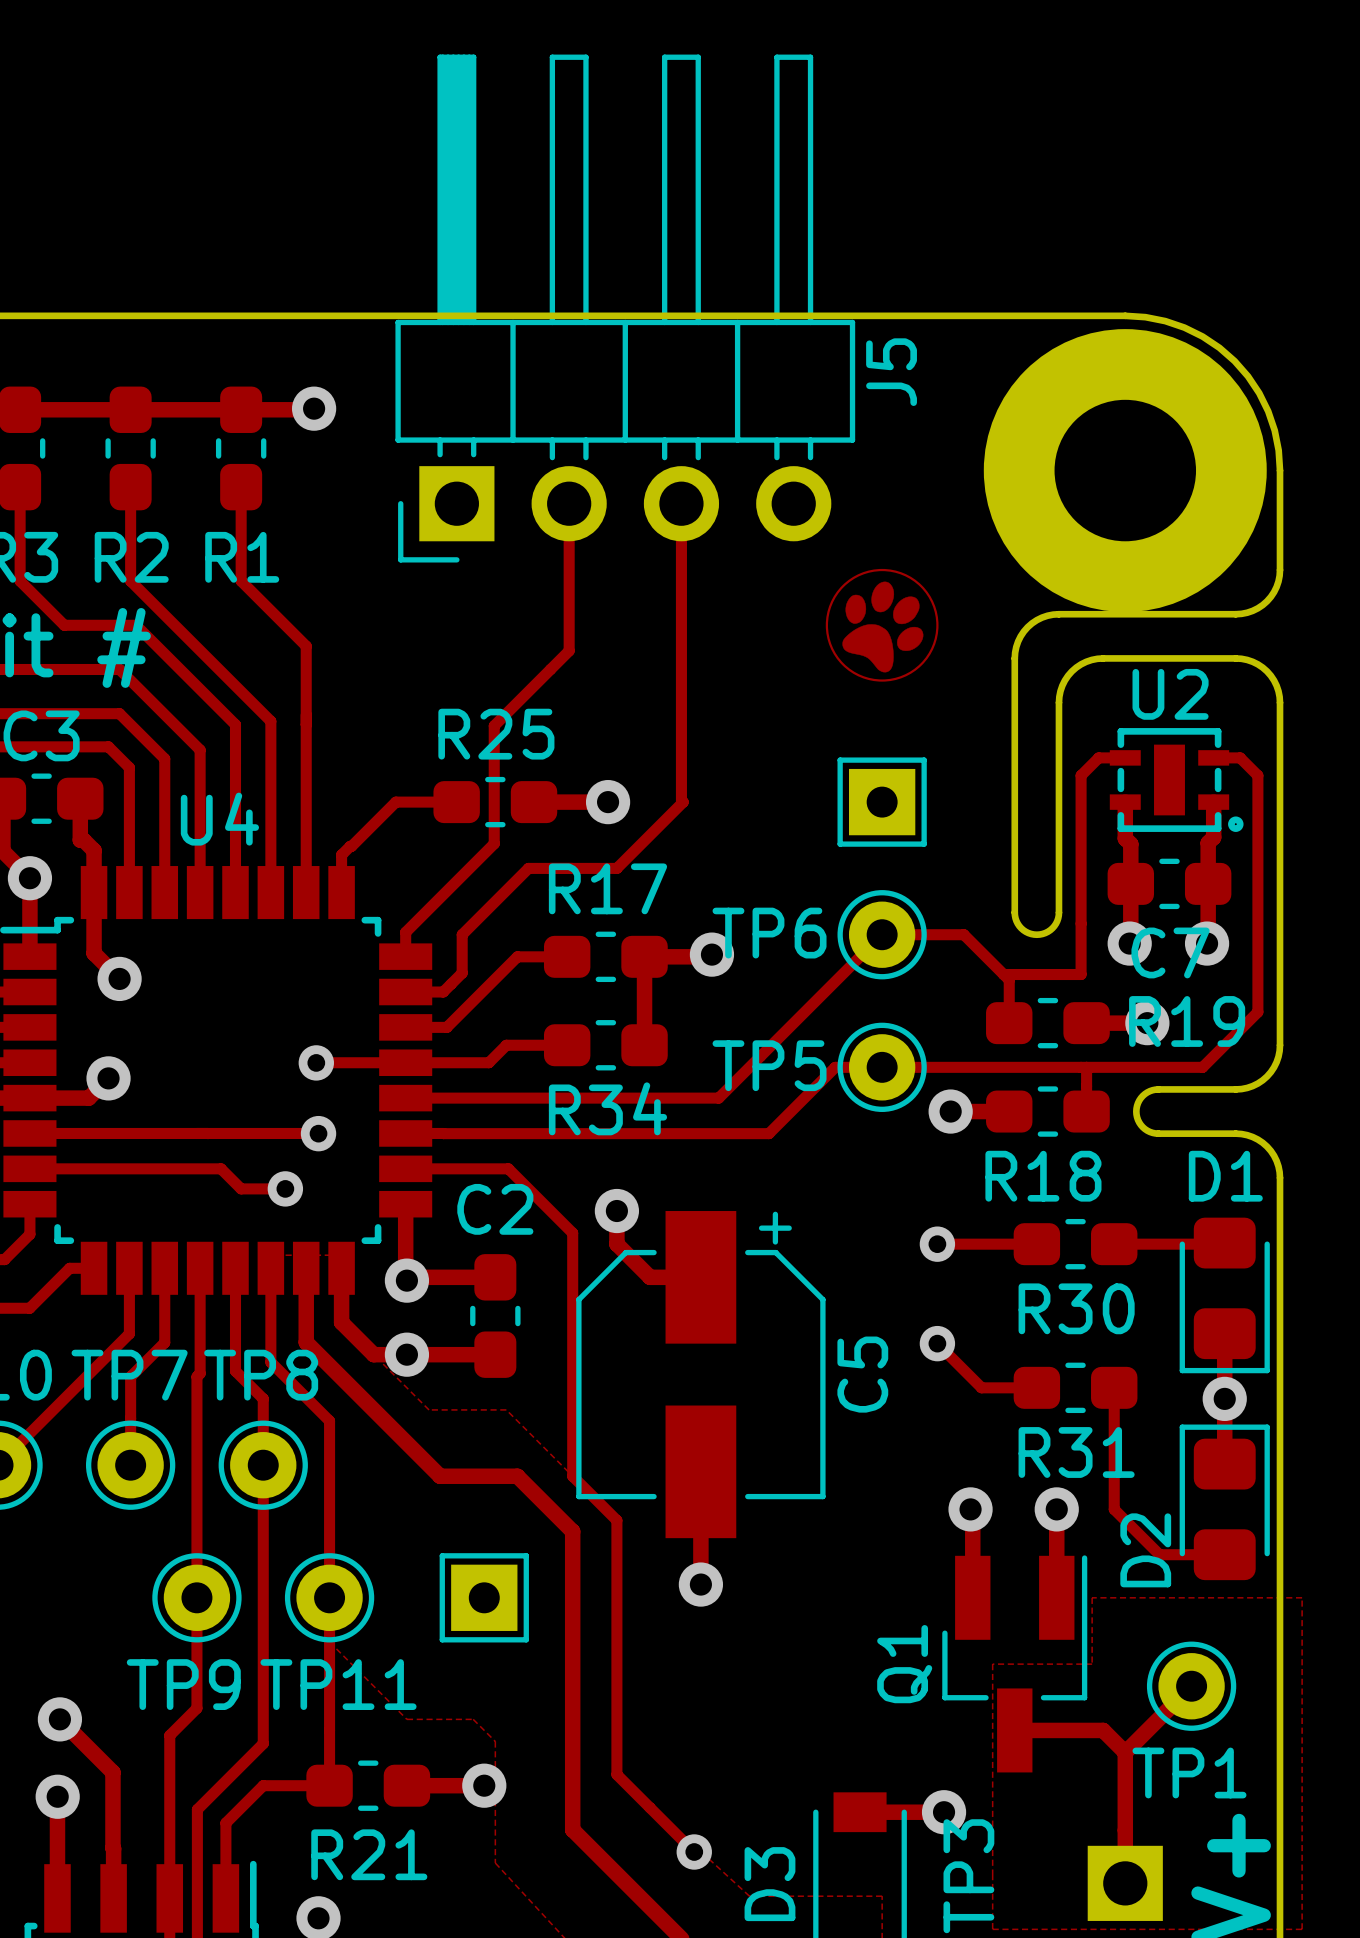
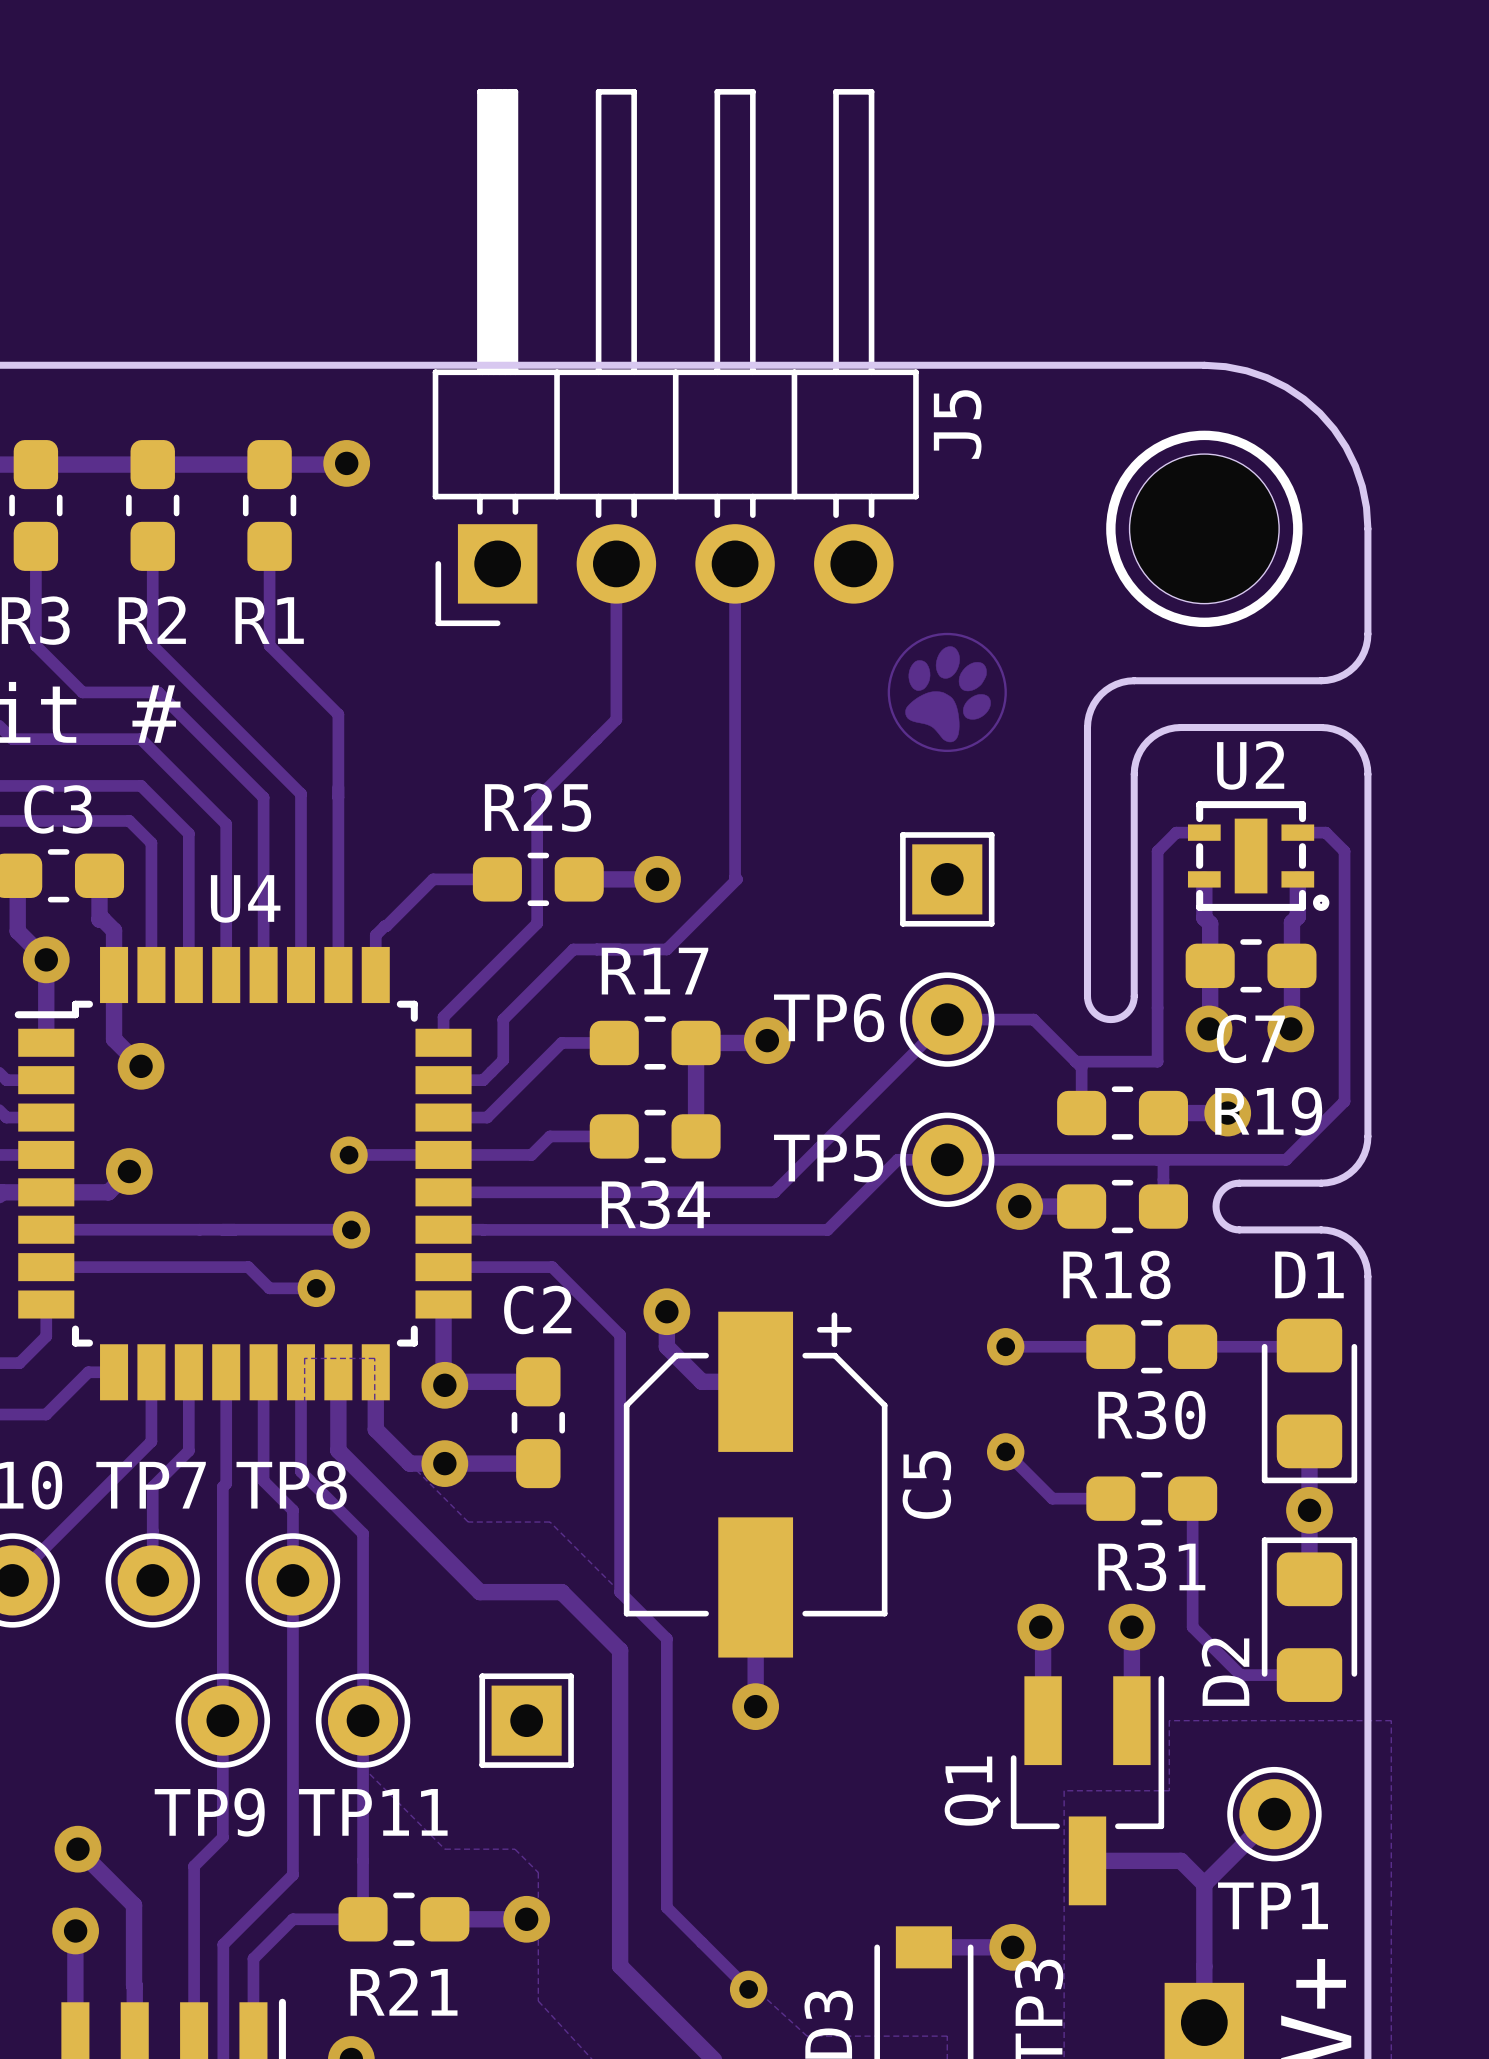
part footprint: [983, 329, 1267, 613] -> [1129, 454, 1280, 604]
drawing: none -> [1106, 430, 1303, 627]

